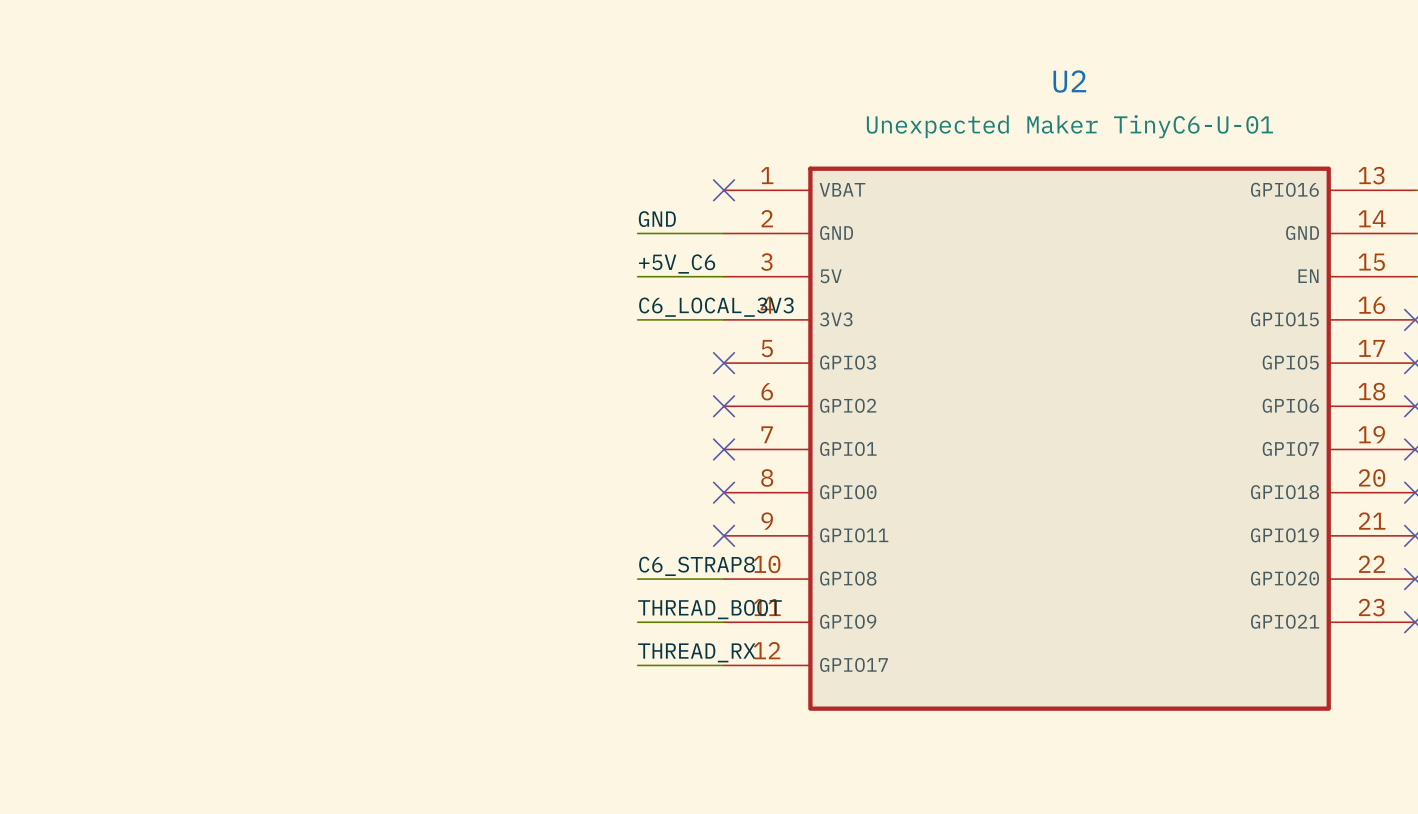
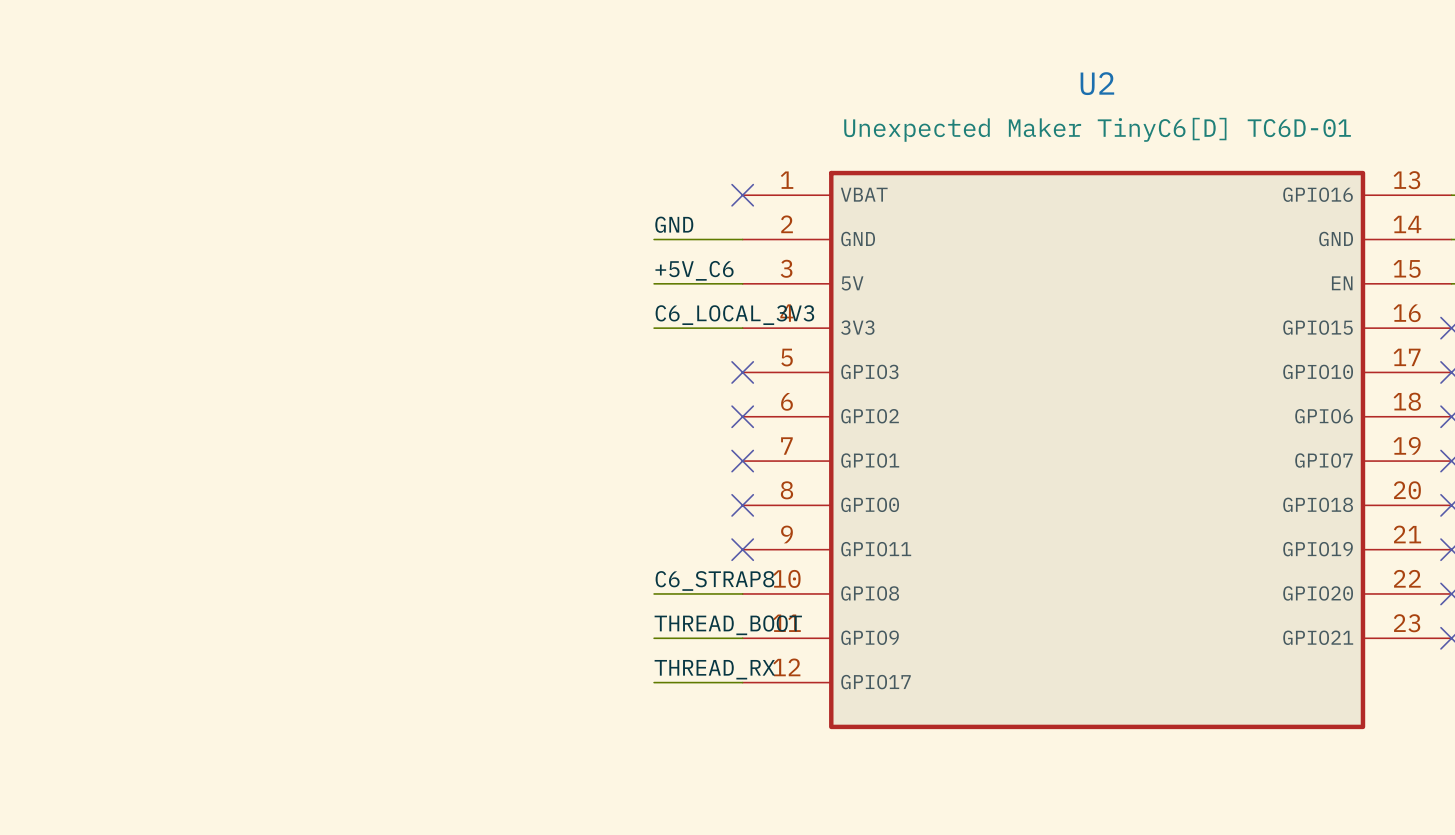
U2 value: Unexpected Maker TinyC6-U-01 (1069, 126) -> Unexpected Maker TinyC6[D] TC6D-01 (1097, 129)
U2 pin name: GPIO5 (1290, 362) -> GPIO10 (1318, 371)

